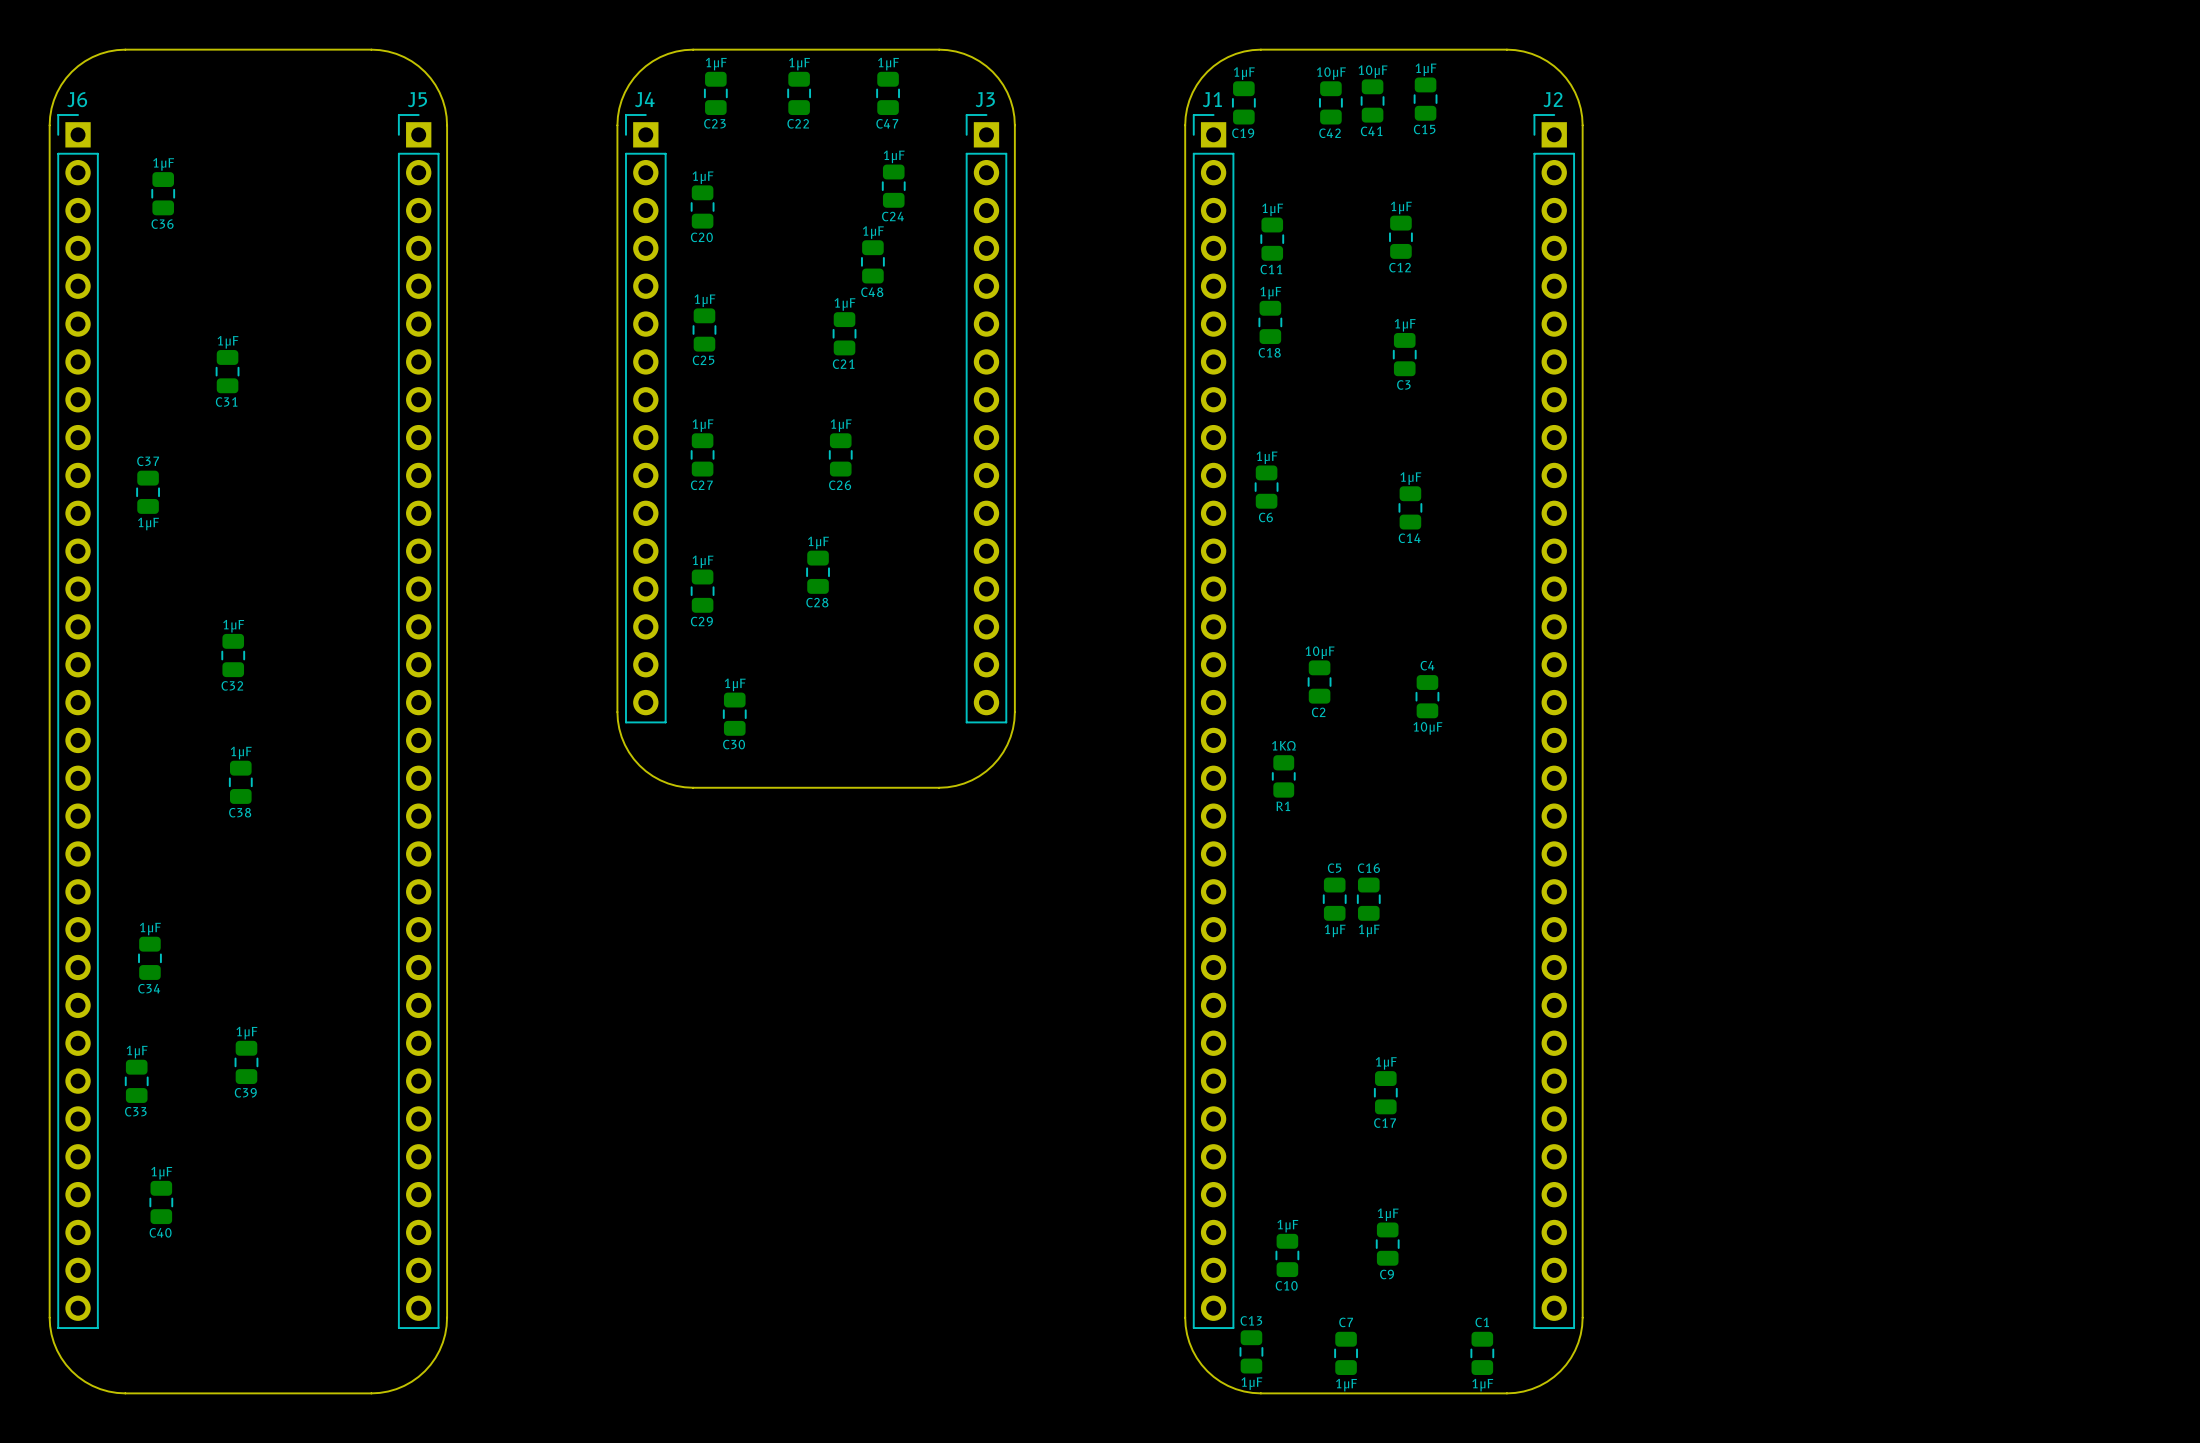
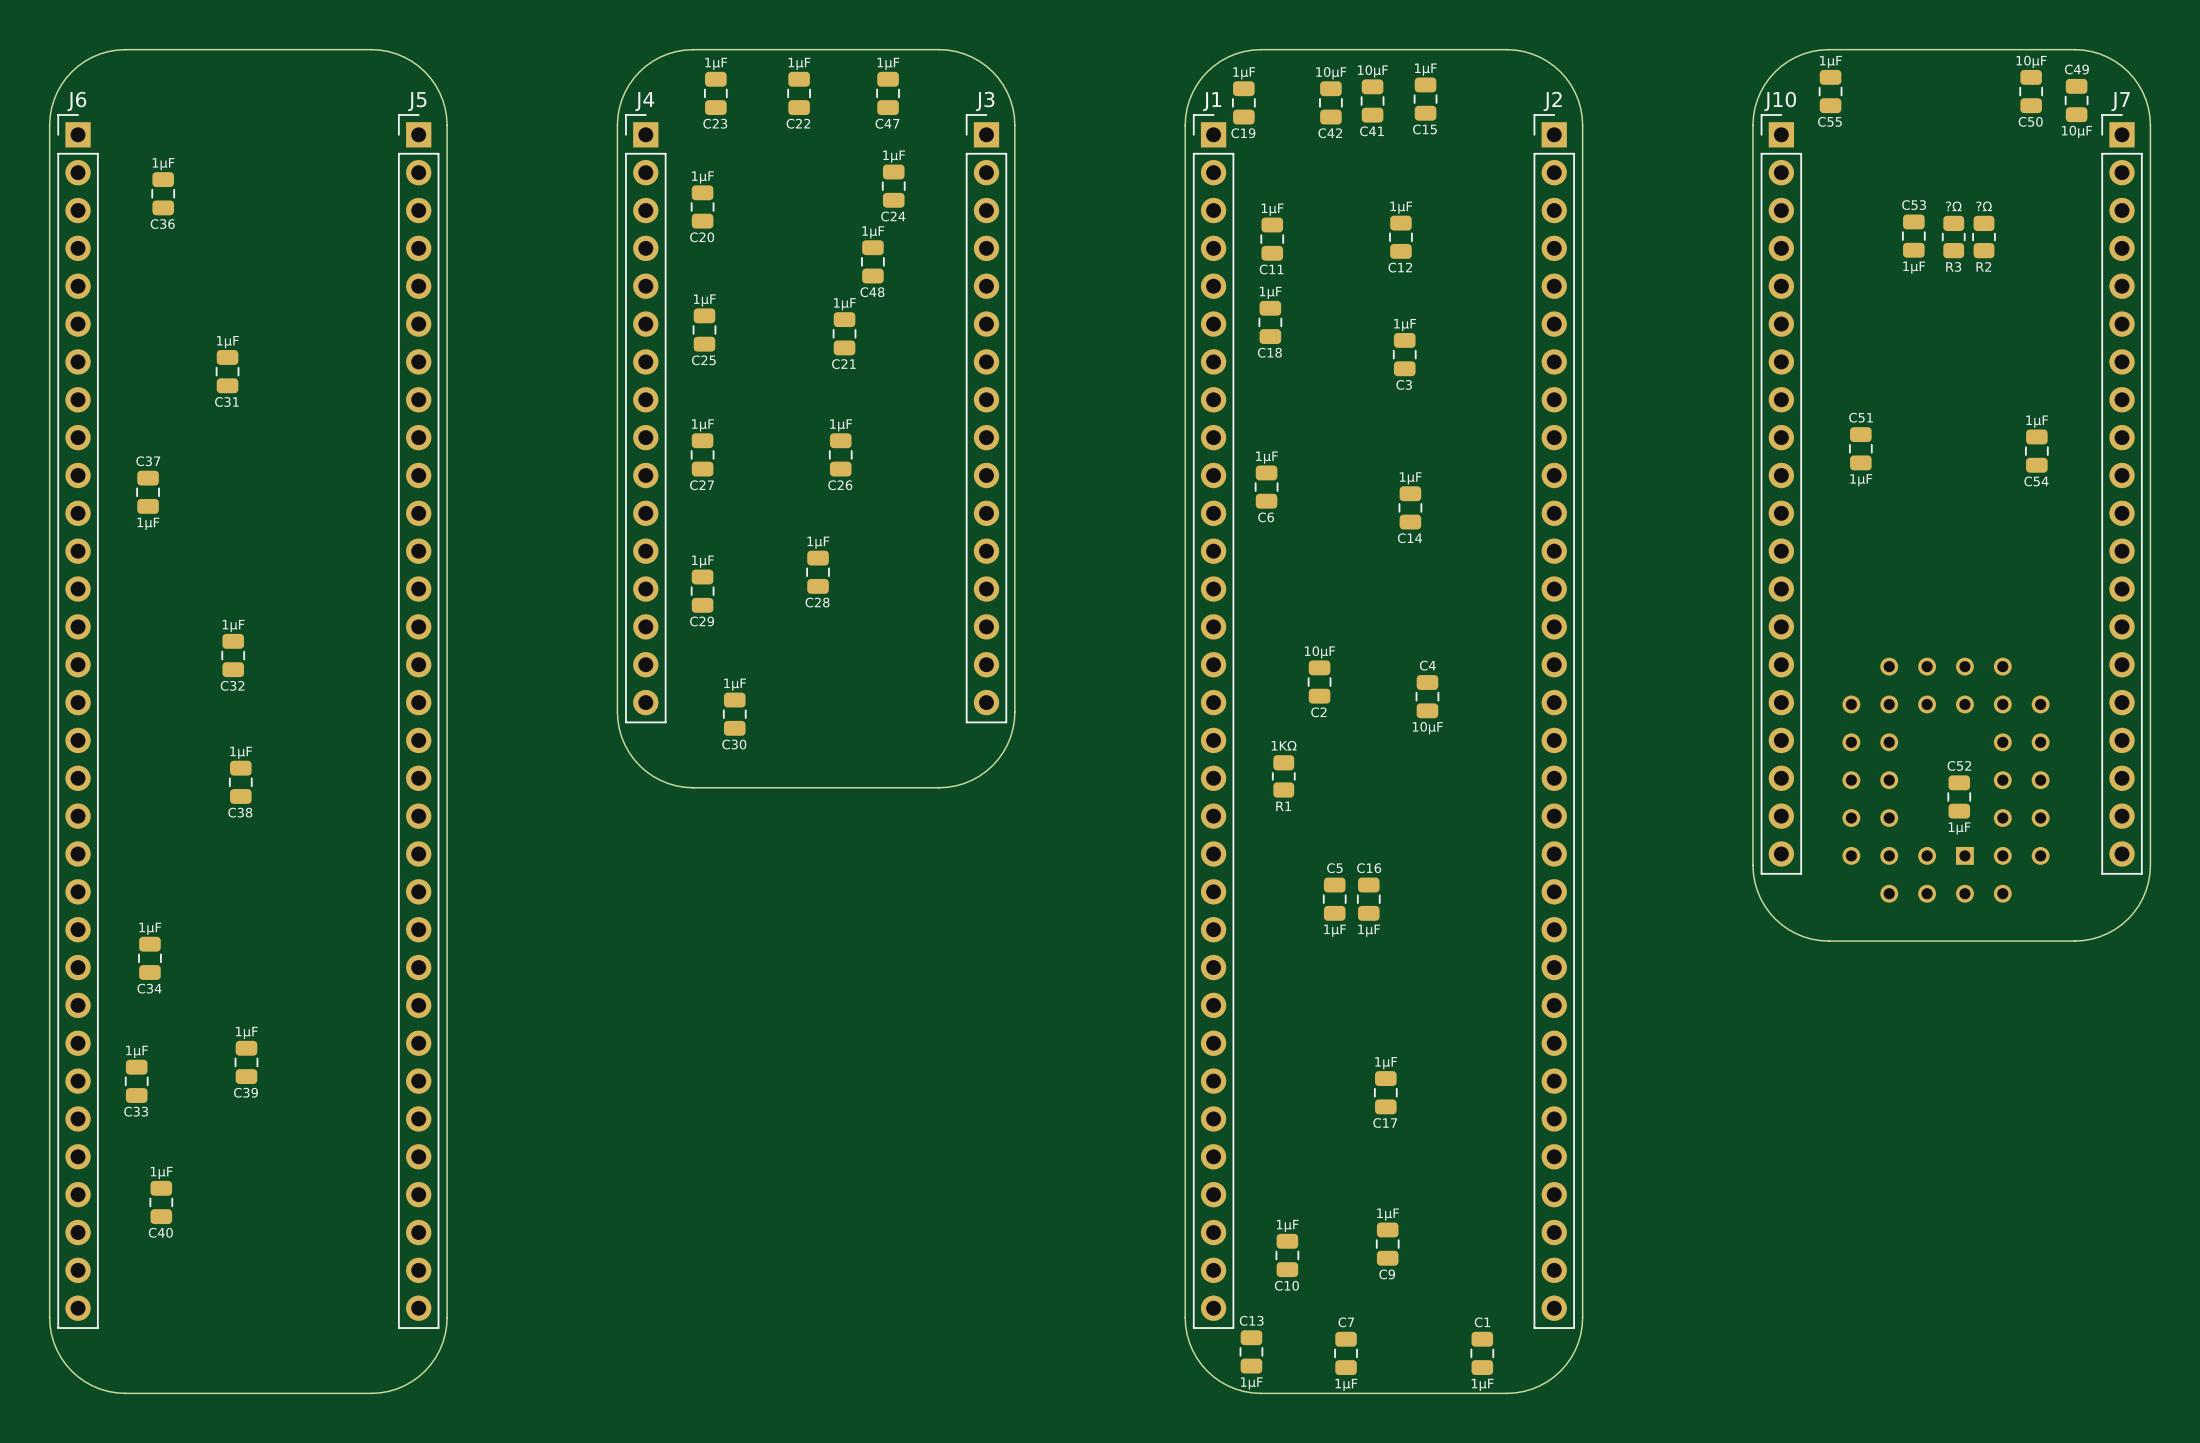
board edge: none -> (2074, 49) (1820, 50) (1803, 53) (1781, 66) (1764, 85) (1757, 100) (1752, 125) (1752, 865) (1754, 882) (1764, 905) (1781, 924) (1803, 936) (1828, 941) (2083, 940) (2107, 933) (2121, 924) (2133, 912) (2146, 890) (2150, 865) (2149, 116) (2142, 92) (2128, 71) (2107, 57) (2091, 51) (2074, 49)
C55: none -> 1μF (1830, 91)
C50: none -> 10μF (2031, 91)
C49: none -> 10μF (2076, 100)
C53: none -> 1μF (1913, 236)
R3: none -> ?Ω (1953, 237)
R2: none -> ?Ω (1984, 237)
C51: none -> 1μF (1860, 448)
C54: none -> 1μF (2036, 451)
J10: none -> (1781, 494)
J7: none -> (2122, 494)
part: none -> (1946, 780)
C52: none -> 1μF (1959, 796)

